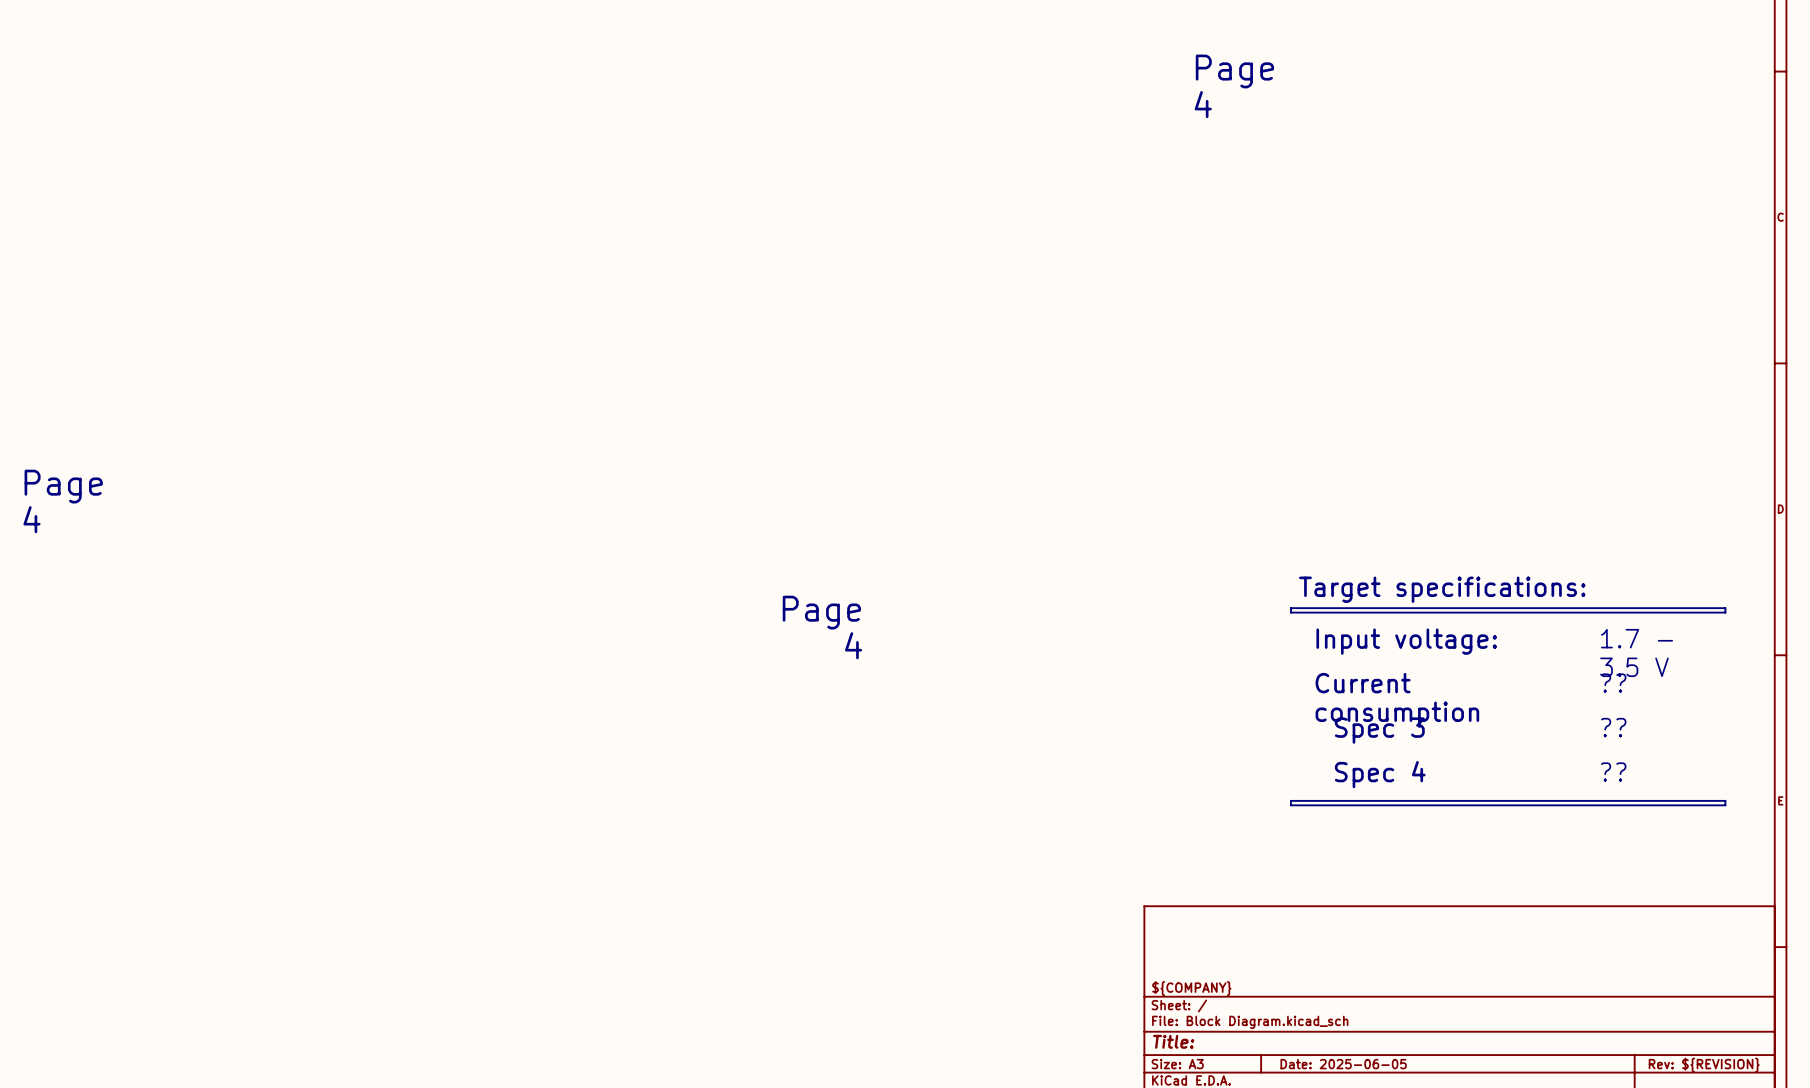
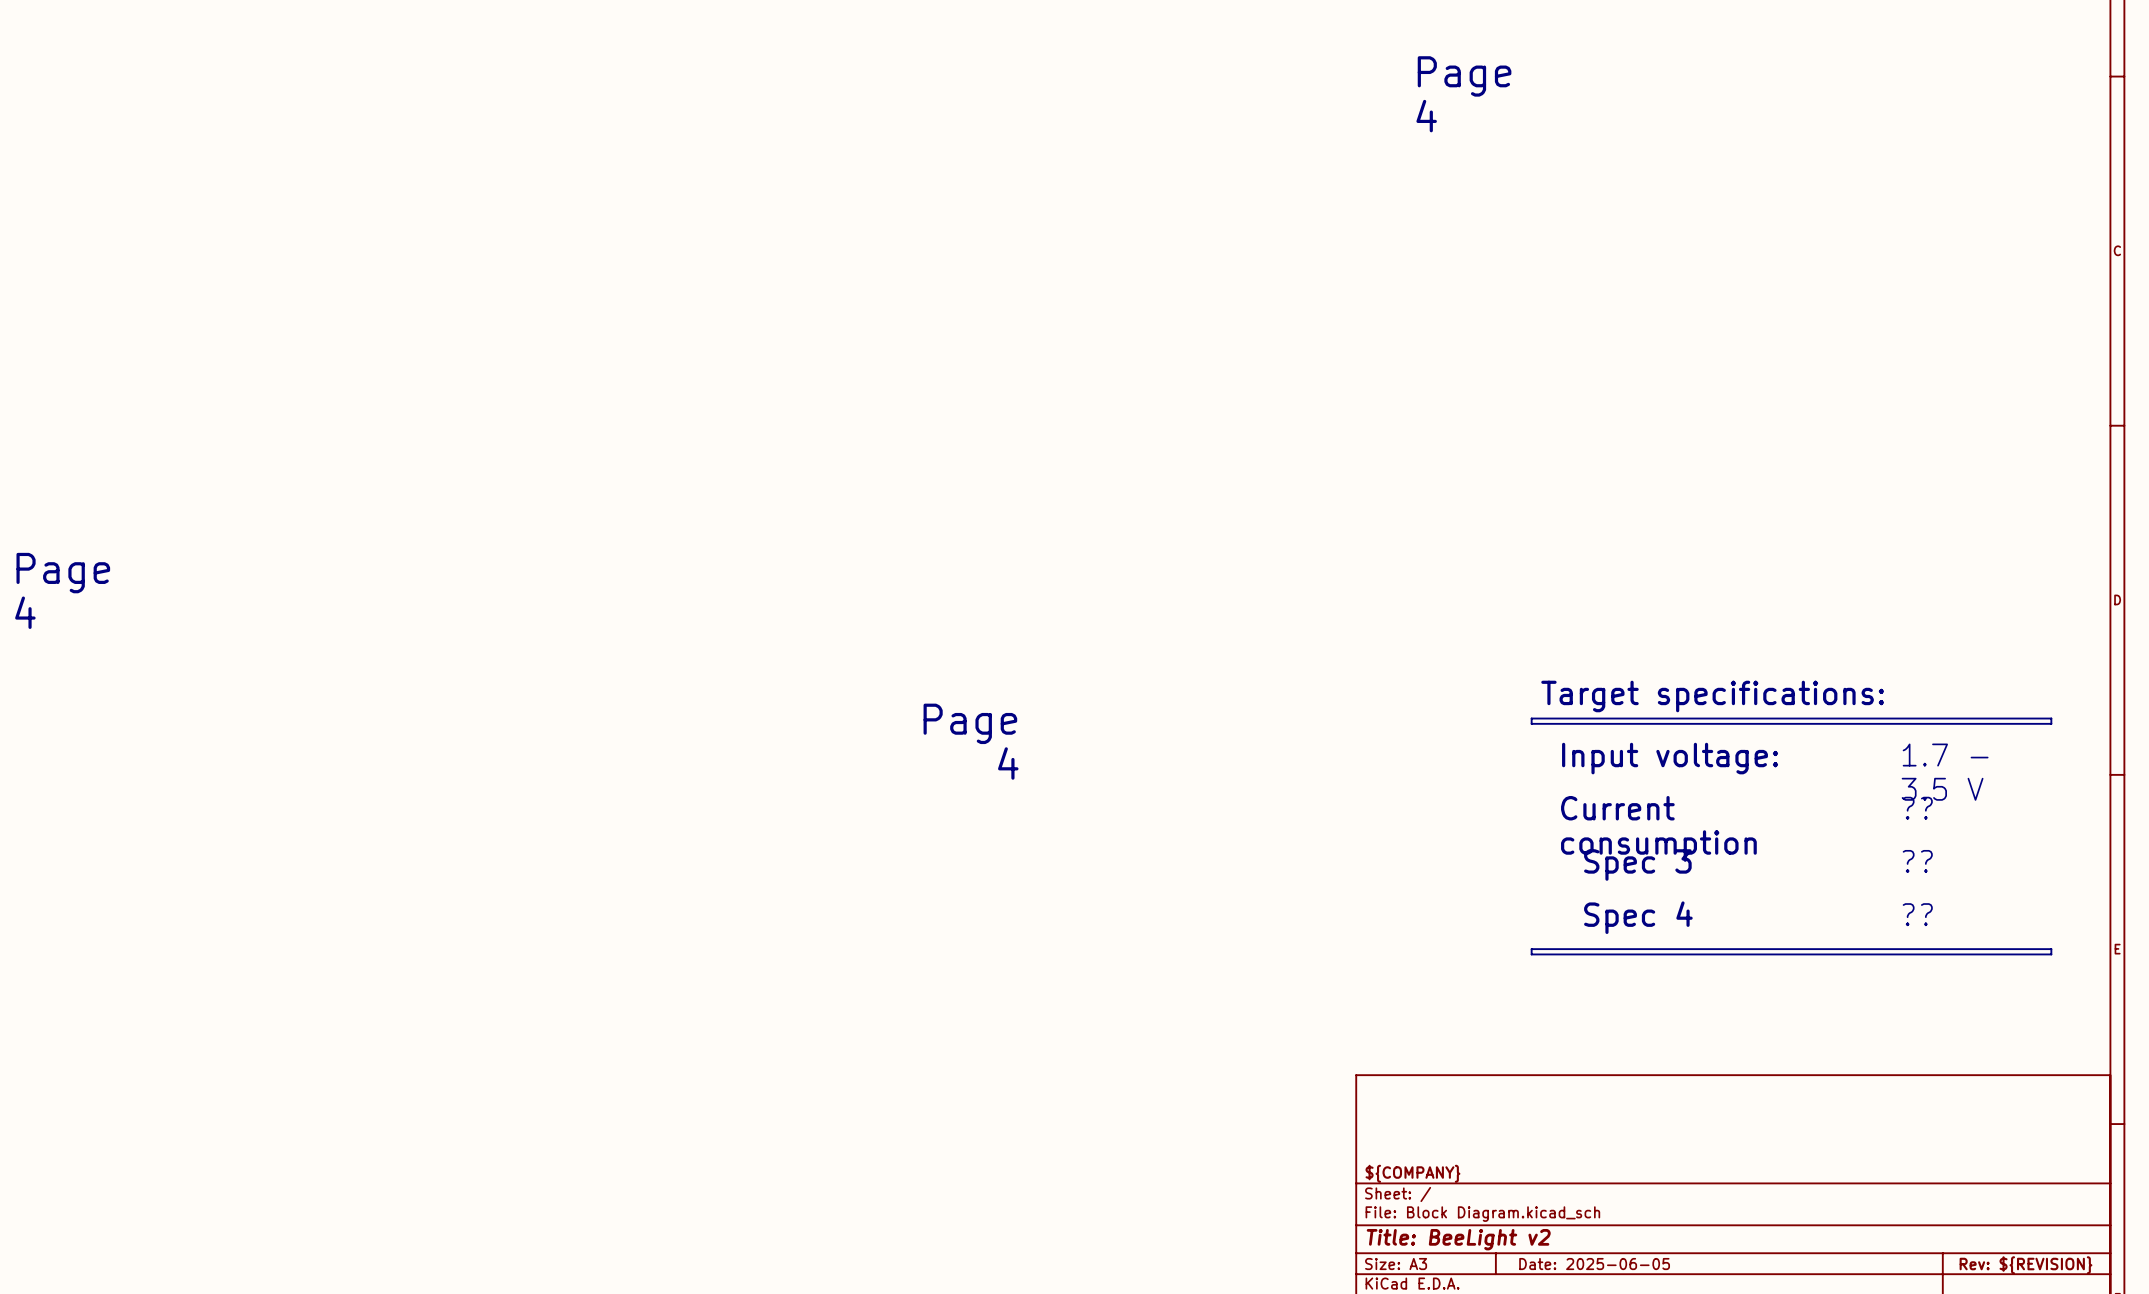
title block: Title: (1173, 1041) -> Title: BeeLight v2 (1458, 1239)

